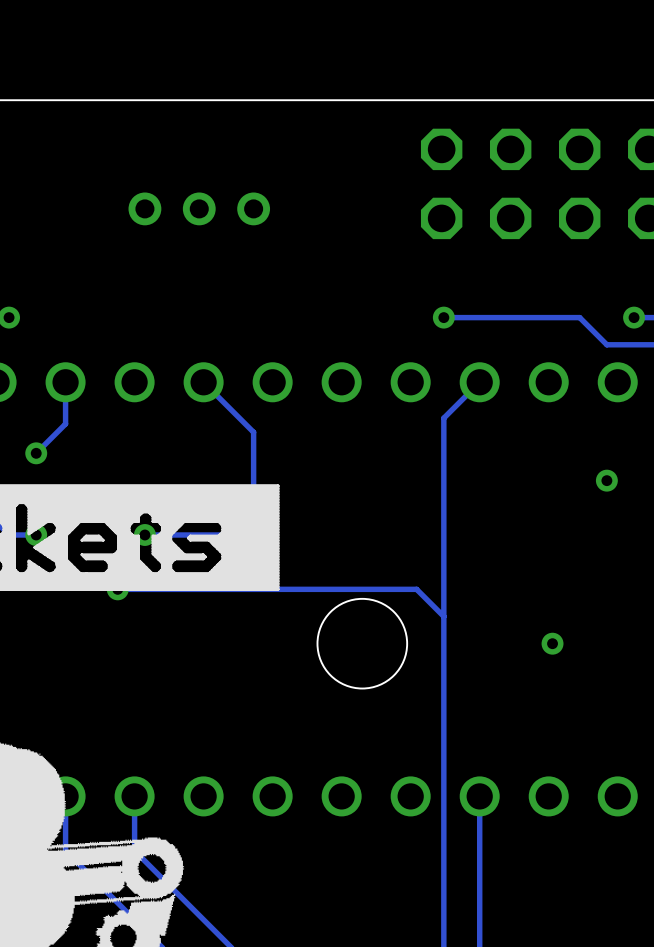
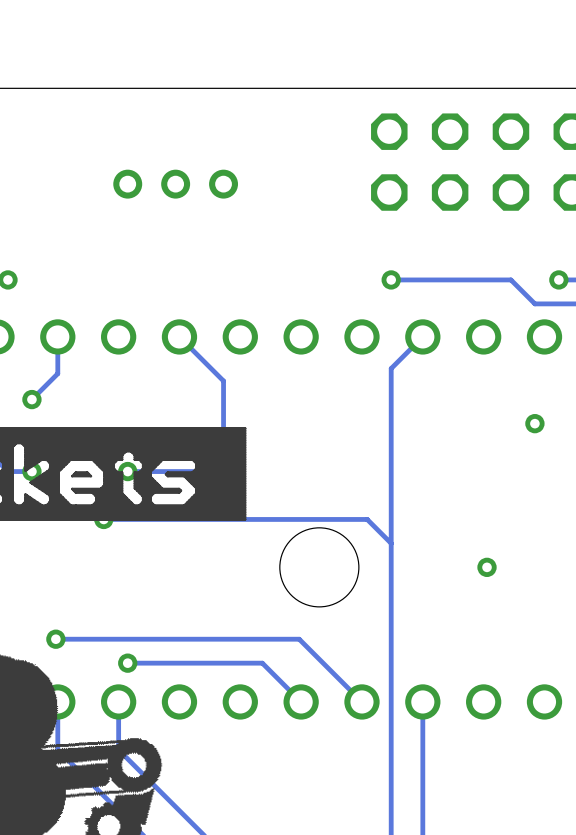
track: none -> (55, 639) (299, 639) (361, 701)
via: none -> (55, 639)
track: none -> (127, 663) (262, 663) (301, 701)
via: none -> (127, 663)

